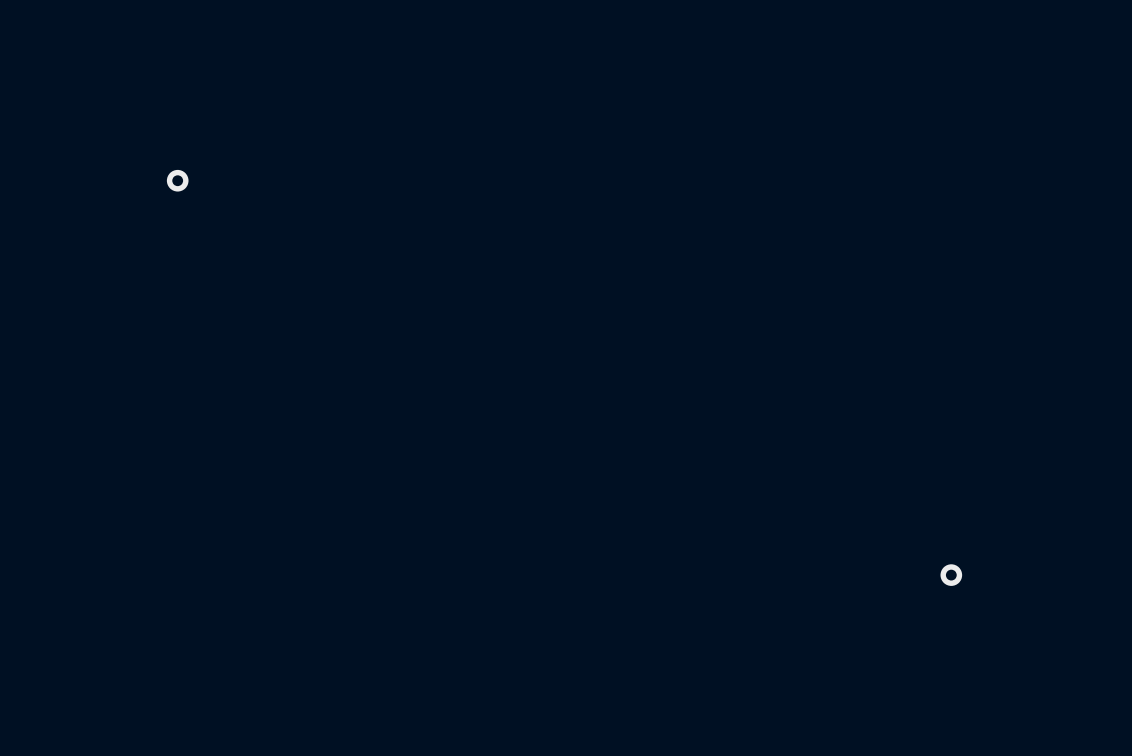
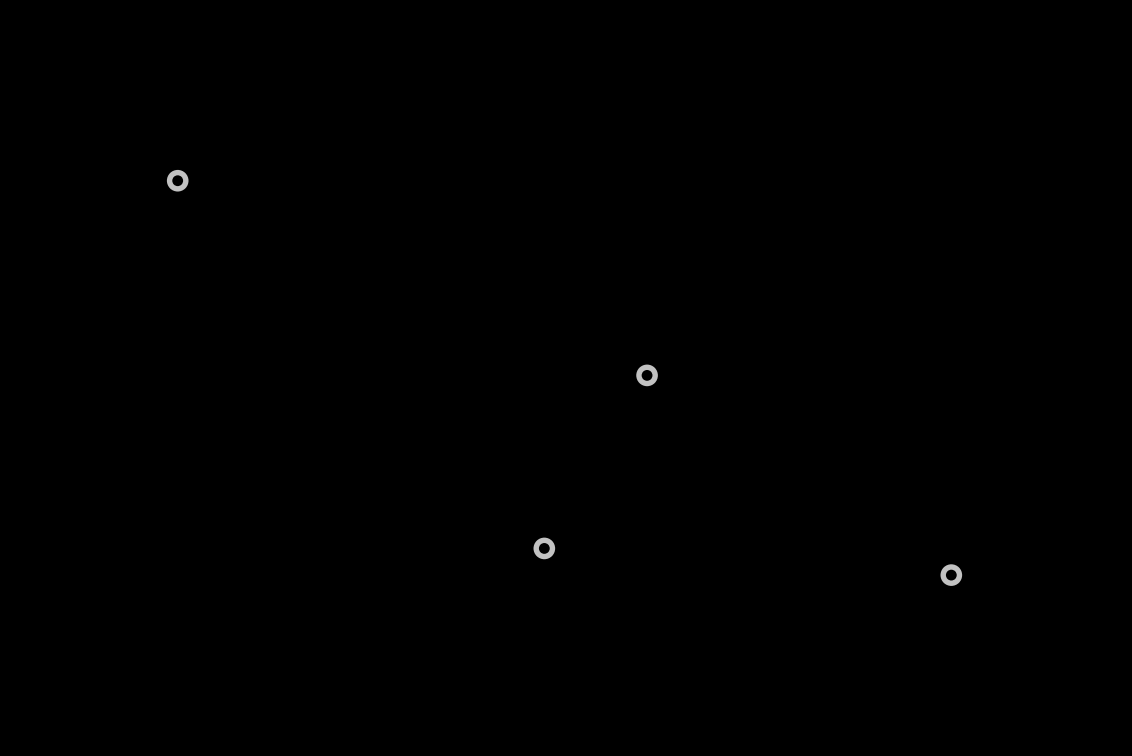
via: none -> (647, 375)
via: none -> (544, 548)

